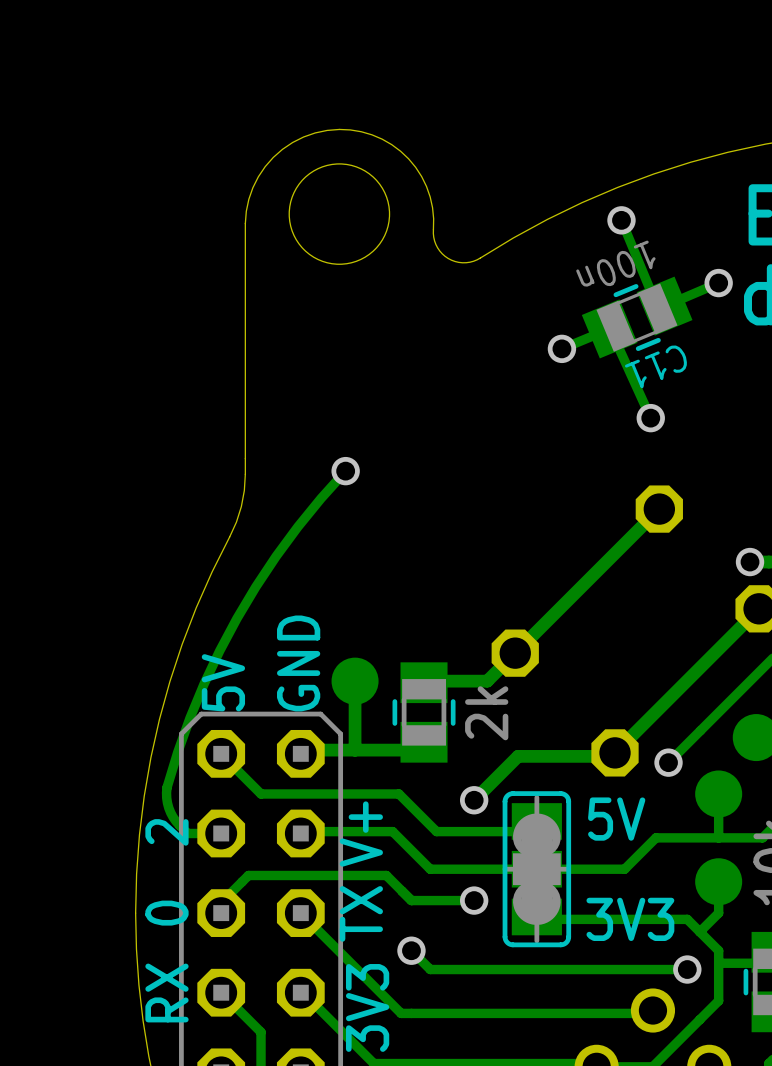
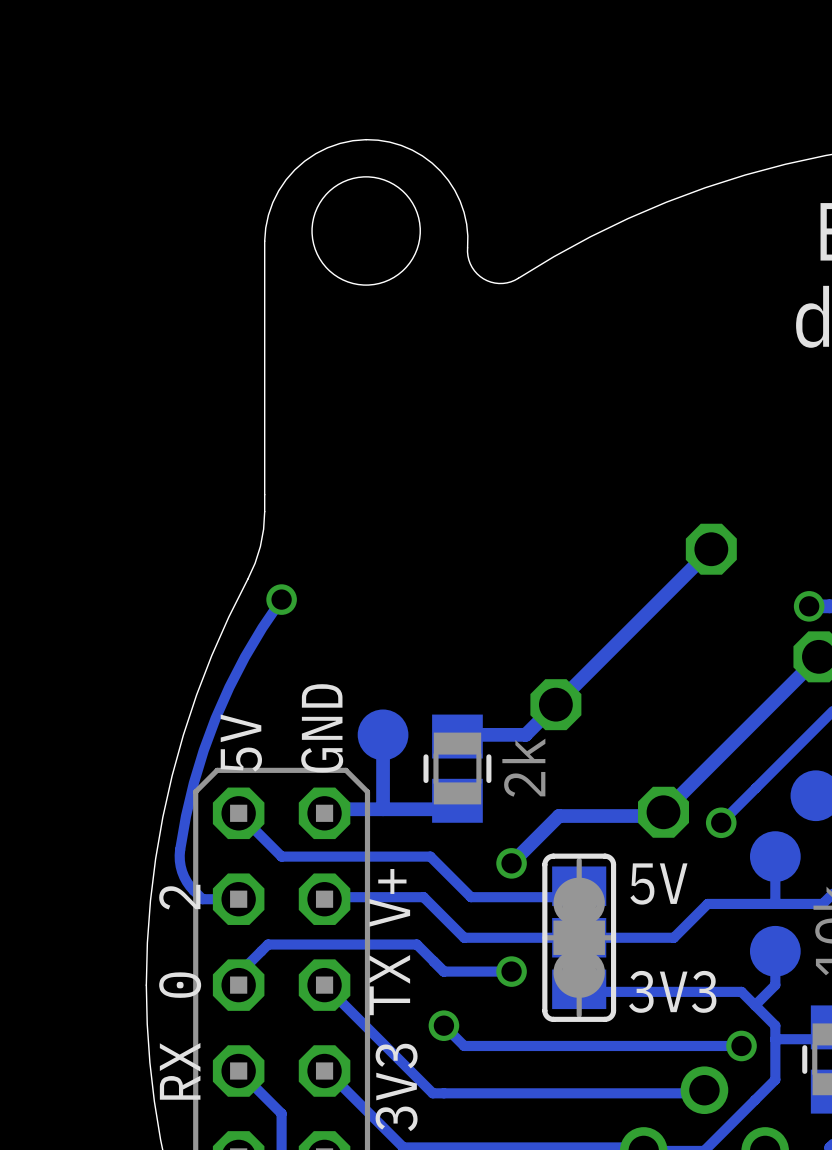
track: (621, 220) (659, 311) (664, 306) (718, 283) -> none
via: (621, 220) -> none
via: (718, 283) -> none
C11: 100n (637, 317) -> none
track: (561, 348) (609, 329) (650, 418) -> none
via: (561, 348) -> none
via: (650, 418) -> none
track: (345, 471) (297, 526) (276, 556) (236, 618) (204, 684) (190, 718) (166, 787) -> (281, 599) (244, 657) (215, 718) (193, 783) (180, 849)
via position: (345, 471) -> (281, 599)

